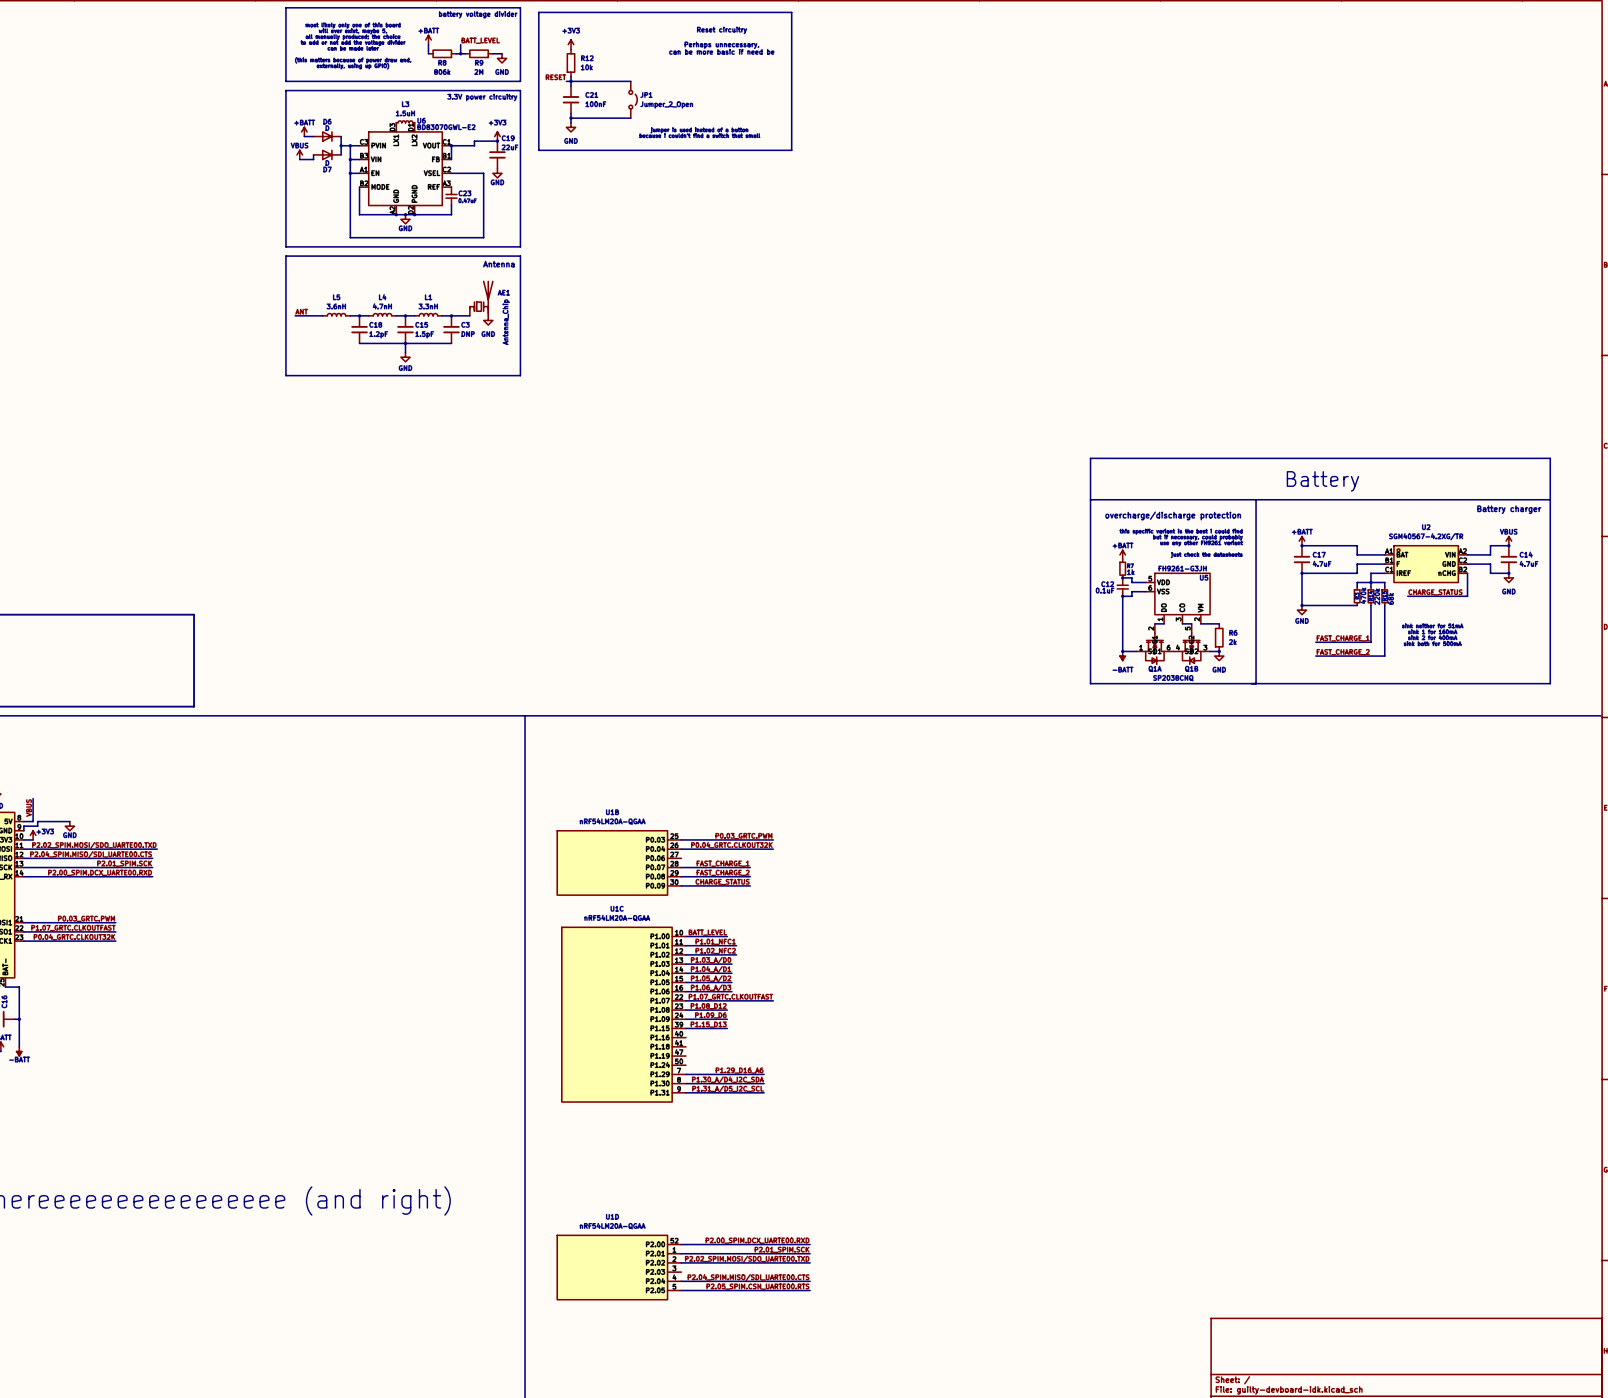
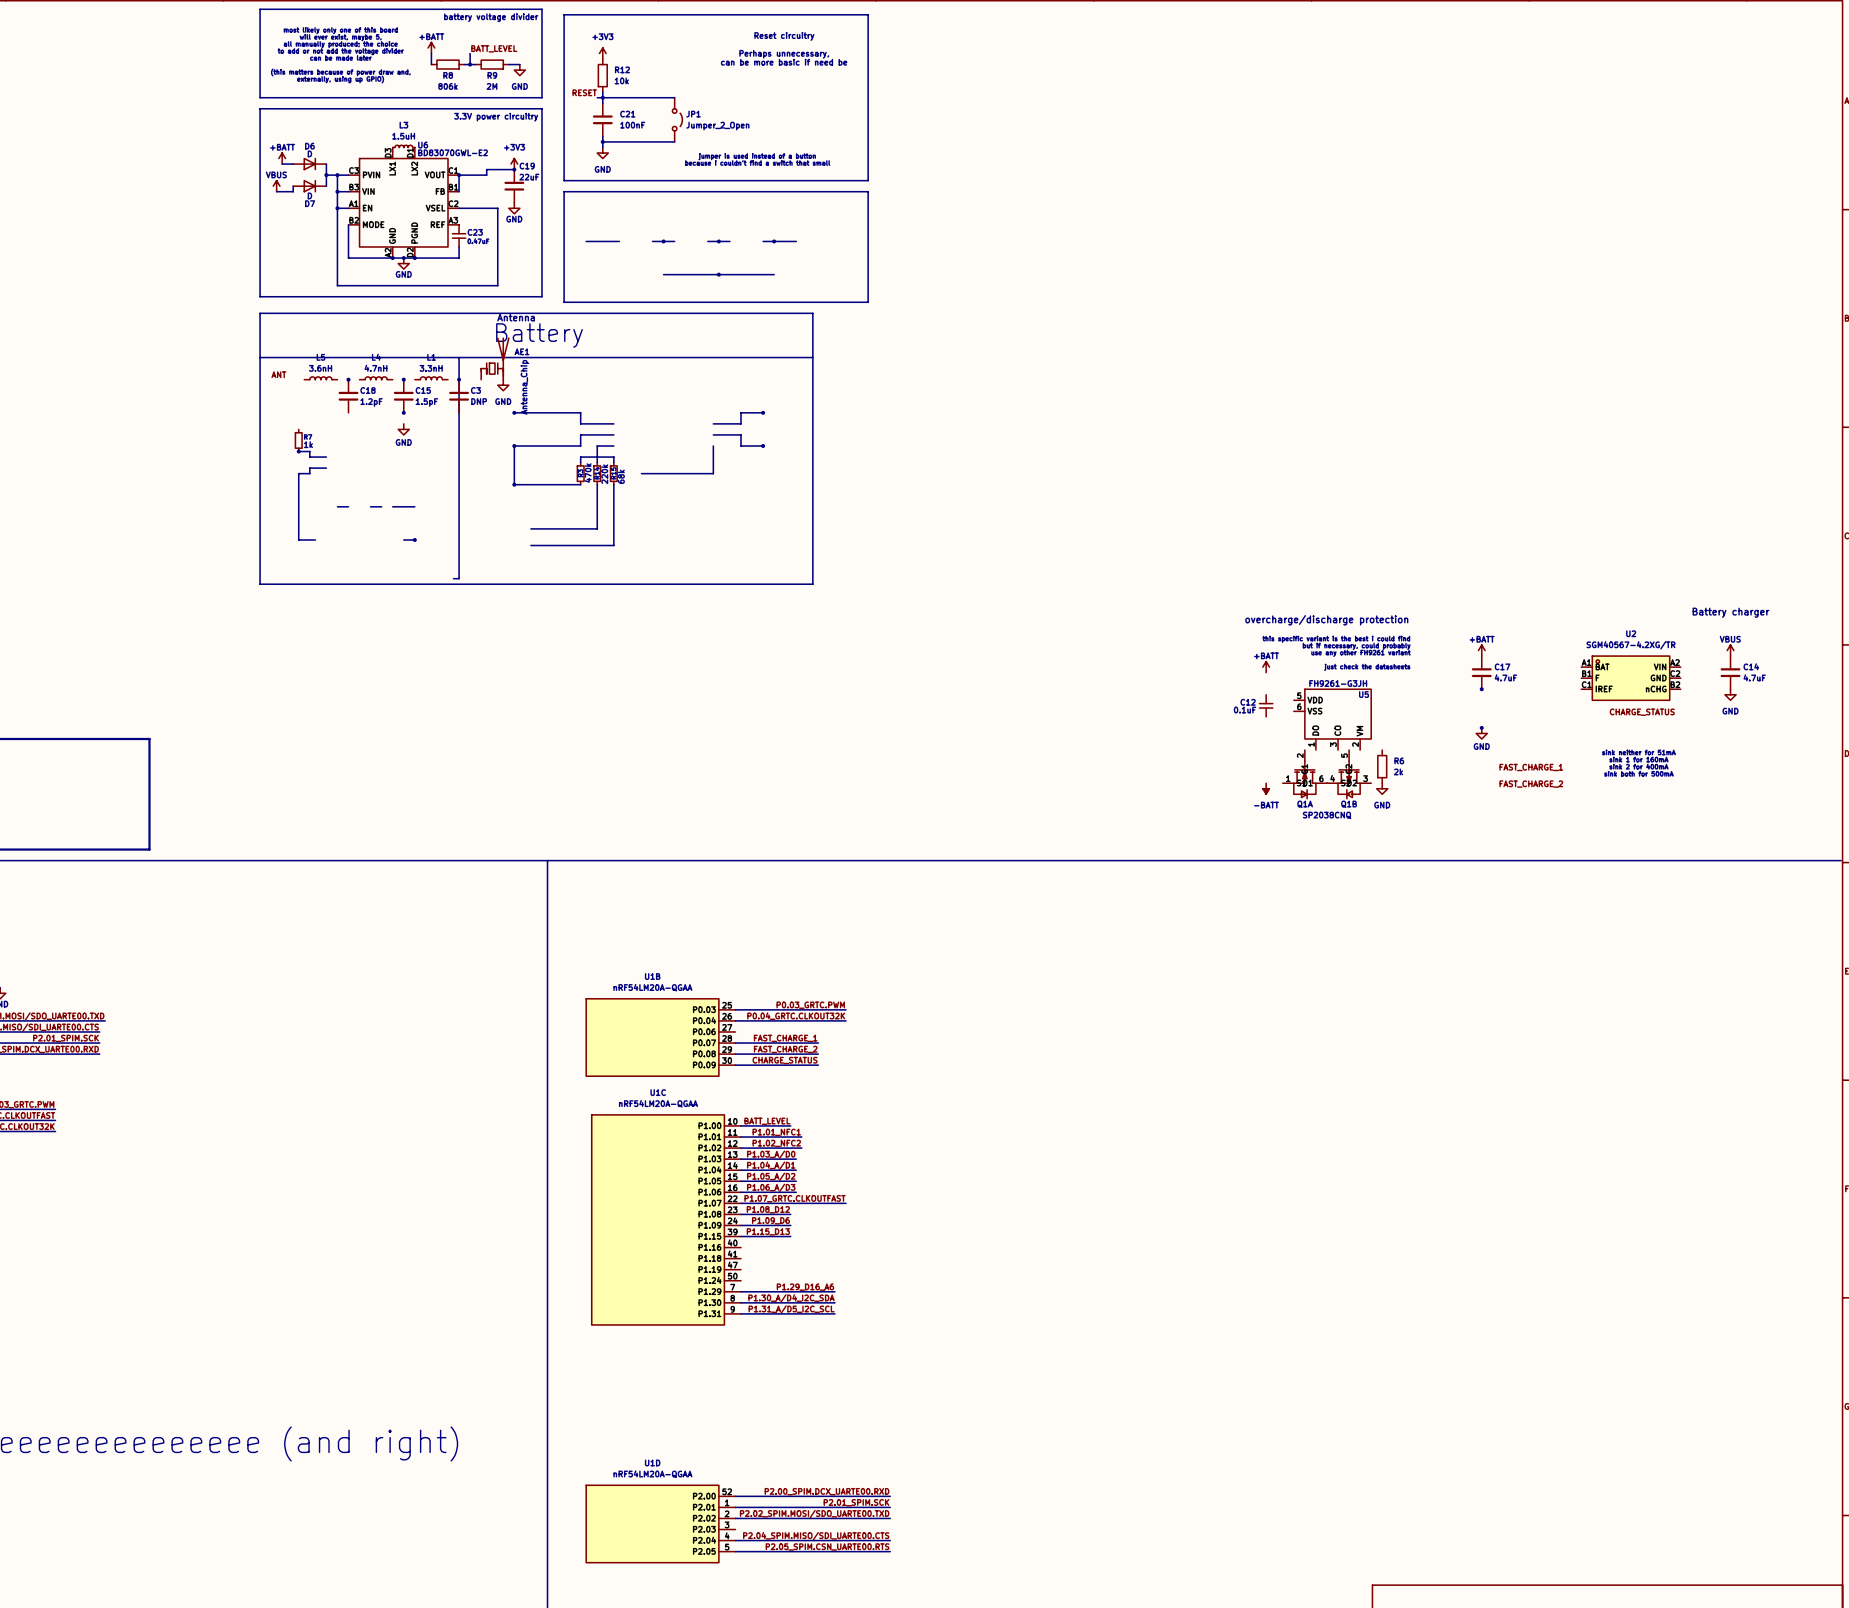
line: none -> (564, 191) (868, 191) (868, 302) (564, 302) (564, 191)
wire: none -> (586, 241) (619, 241)
wire: none -> (652, 241) (674, 241)
junction: none -> (663, 241)
wire: none -> (707, 241) (729, 241)
junction: none -> (718, 241)
wire: none -> (763, 241) (796, 241)
junction: none -> (774, 241)
wire: none -> (663, 274) (774, 274)
junction: none -> (718, 274)
line: (285, 260) (285, 256) (520, 256) (520, 375) (285, 375) -> (260, 313) (812, 313) (812, 584) (260, 584) (260, 451)
text: none -> Battery (539, 335)
line: none -> (260, 357) (812, 357)
line: none -> (459, 357) (459, 578) (453, 578)
wire: (295, 315) (322, 315) -> none
wire: (350, 315) (368, 315) -> none
wire: (396, 315) (414, 315) -> none
wire: (442, 315) (469, 315) -> none
wire: (359, 343) (451, 343) -> none
wire: (405, 343) (405, 352) -> none
wire: none -> (514, 412) (580, 412) (580, 423) (613, 423)
junction: none -> (514, 412)
wire: none -> (763, 412) (740, 412) (740, 423) (713, 423)
junction: none -> (763, 412)
wire: none -> (613, 434) (580, 434) (580, 446) (514, 446) (514, 484) (580, 484)
wire: none -> (713, 434) (740, 434) (740, 446) (763, 446)
junction: none -> (514, 446)
wire: none -> (613, 446) (597, 446) (597, 462)
wire: none -> (713, 446) (713, 473) (641, 473)
junction: none -> (763, 446)
wire: none -> (298, 451) (309, 451) (309, 457) (326, 457)
junction: none -> (298, 451)
wire: none -> (580, 462) (580, 457) (613, 457) (613, 462)
wire: none -> (326, 468) (309, 468) (309, 473) (298, 473) (298, 539) (315, 539)
junction: none -> (514, 484)
wire: none -> (597, 484) (597, 528) (530, 528)
wire: none -> (613, 484) (613, 545) (530, 545)
wire: none -> (337, 506) (348, 506)
wire: none -> (370, 506) (381, 506)
wire: none -> (392, 506) (414, 506)
wire: none -> (403, 539) (414, 539)
junction: none -> (414, 539)
line: (1090, 458) (1550, 458) (1550, 683) (1090, 683) (1090, 458) -> none
text: Battery (1322, 481) -> none
line: (1090, 499) (1550, 499) -> none
line: (1256, 499) (1256, 683) -> none
wire: (1302, 545) (1357, 545) (1357, 554) (1384, 554) -> none
junction: (1302, 545) -> none
wire: (1508, 545) (1490, 545) (1490, 554) (1467, 554) -> none
junction: (1508, 545) -> none
wire: (1384, 564) (1357, 564) (1357, 573) (1302, 573) (1302, 605) (1357, 605) -> none
wire: (1467, 564) (1490, 564) (1490, 573) (1508, 573) -> none
part position: (1122, 568) -> (298, 440)
wire: (1384, 573) (1370, 573) (1370, 587) -> none
wire: (1467, 573) (1467, 596) (1407, 596) -> none
junction: (1508, 573) -> none
wire: (1122, 577) (1131, 577) (1131, 582) (1145, 582) -> none
junction: (1122, 577) -> none
wire: (1357, 587) (1357, 582) (1384, 582) (1384, 587) -> none
wire: (1145, 591) (1131, 591) (1131, 596) (1122, 596) (1122, 651) (1136, 651) -> none
junction: (1122, 596) -> none
part position: (1357, 596) -> (580, 473)
part position: (1370, 596) -> (597, 473)
part position: (1384, 596) -> (613, 473)
wire: (1370, 605) (1370, 642) (1315, 642) -> none
wire: (1384, 605) (1384, 656) (1315, 656) -> none
wire: (1154, 623) (1164, 623) -> none
wire: (1182, 623) (1191, 623) -> none
wire: (1200, 623) (1219, 623) -> none
junction: (1122, 651) -> none
wire: (1210, 651) (1219, 651) -> none
junction: (1219, 651) -> none

